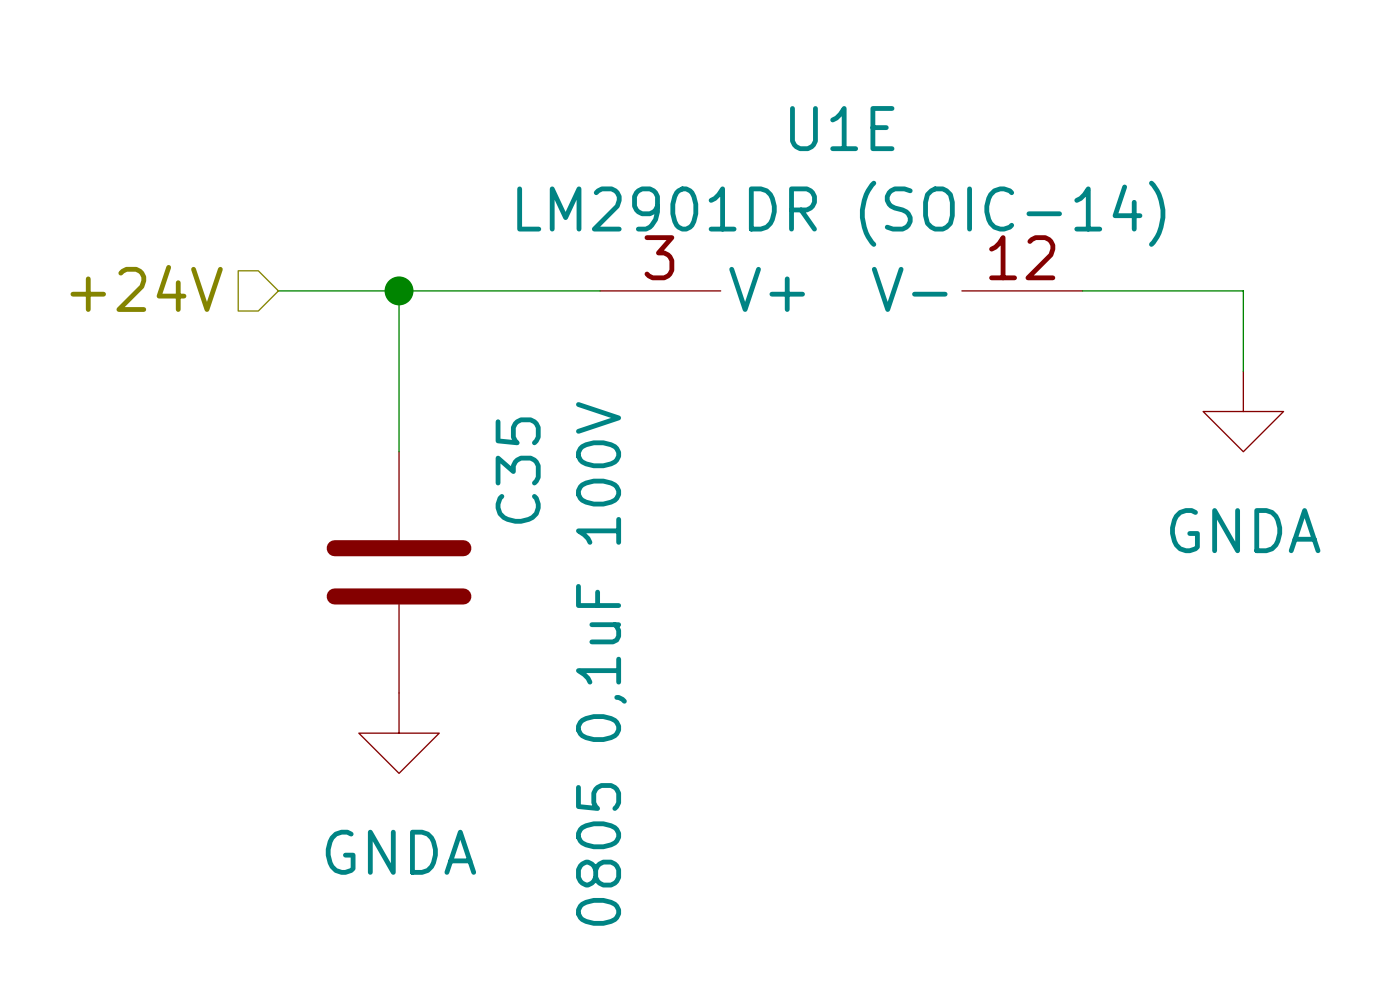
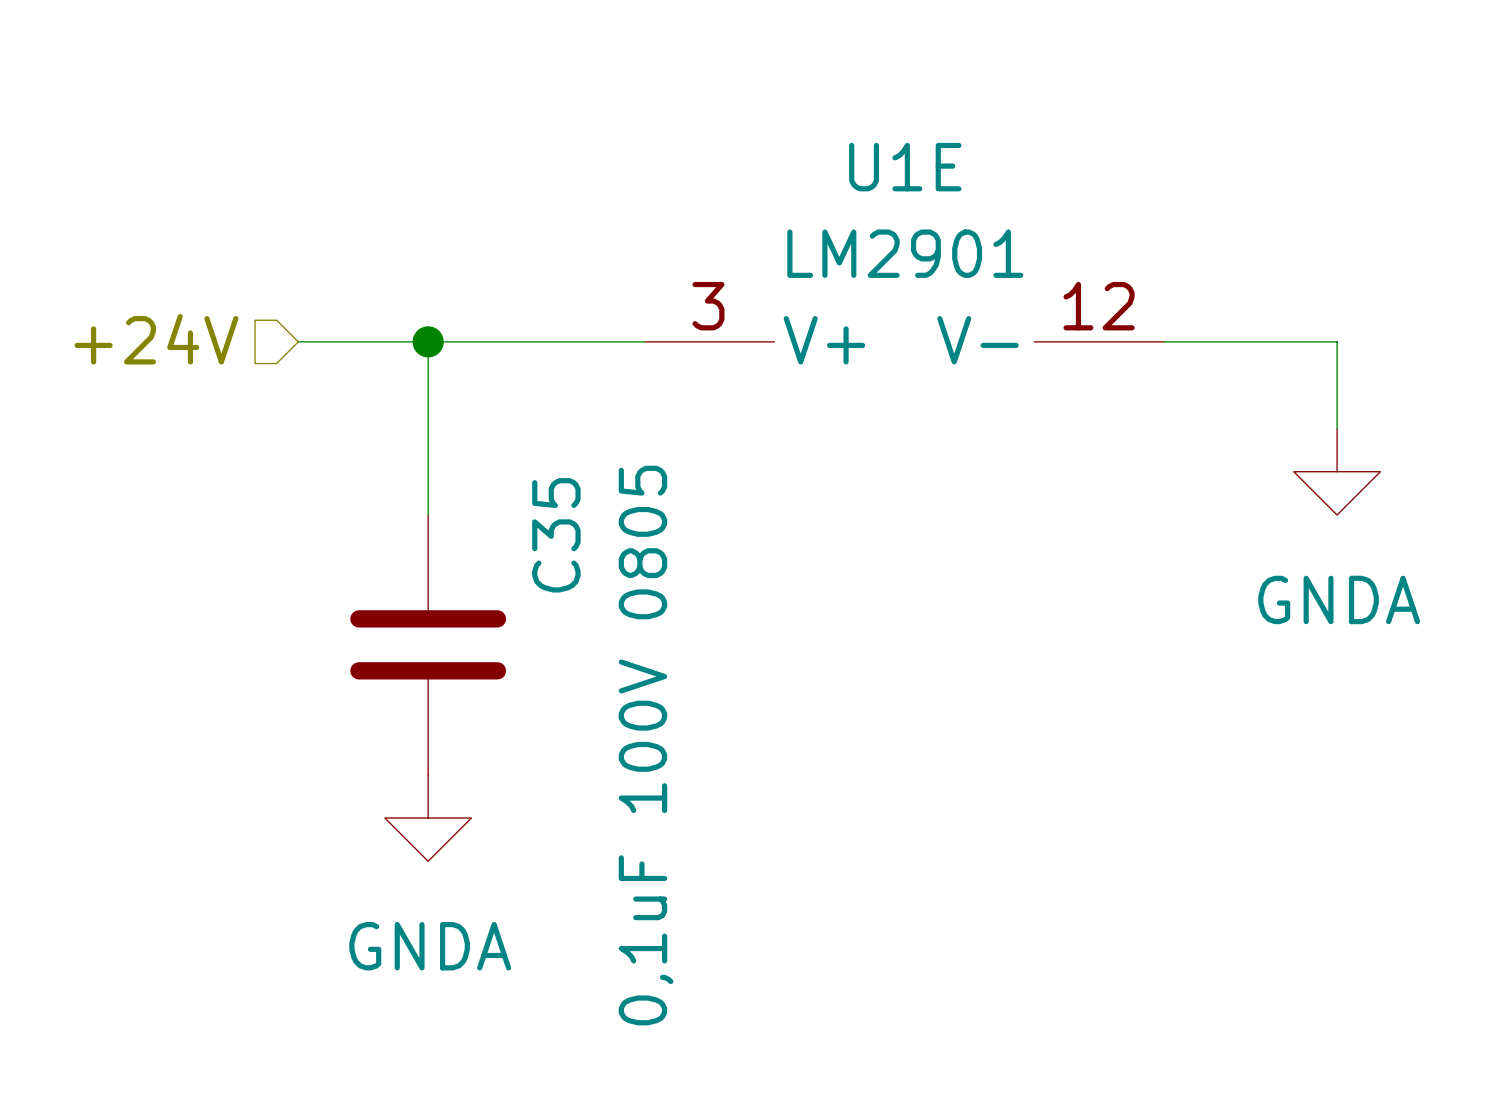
U1E value: LM2901DR (SOIC-14) (841, 213) -> LM2901 (905, 253)
C35 value: 0805 0,1uF 100V (601, 663) -> 0,1uF 100V 0805 (646, 745)

